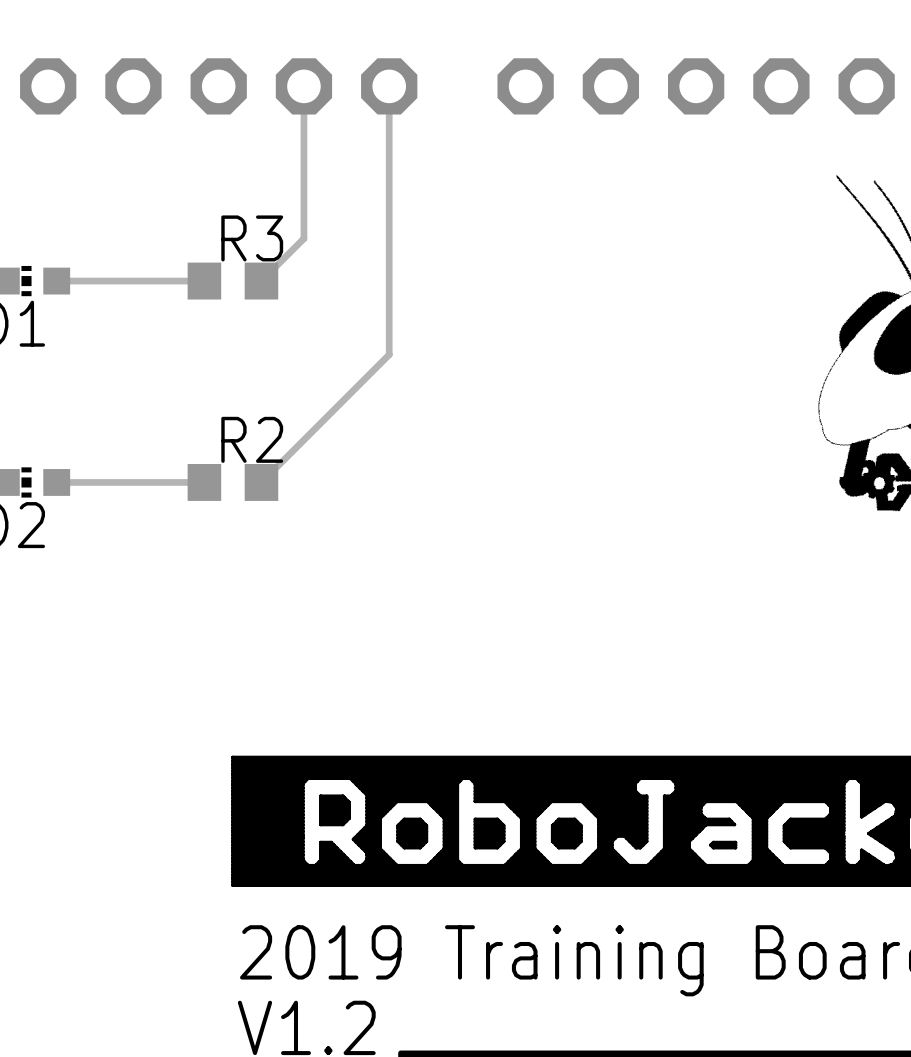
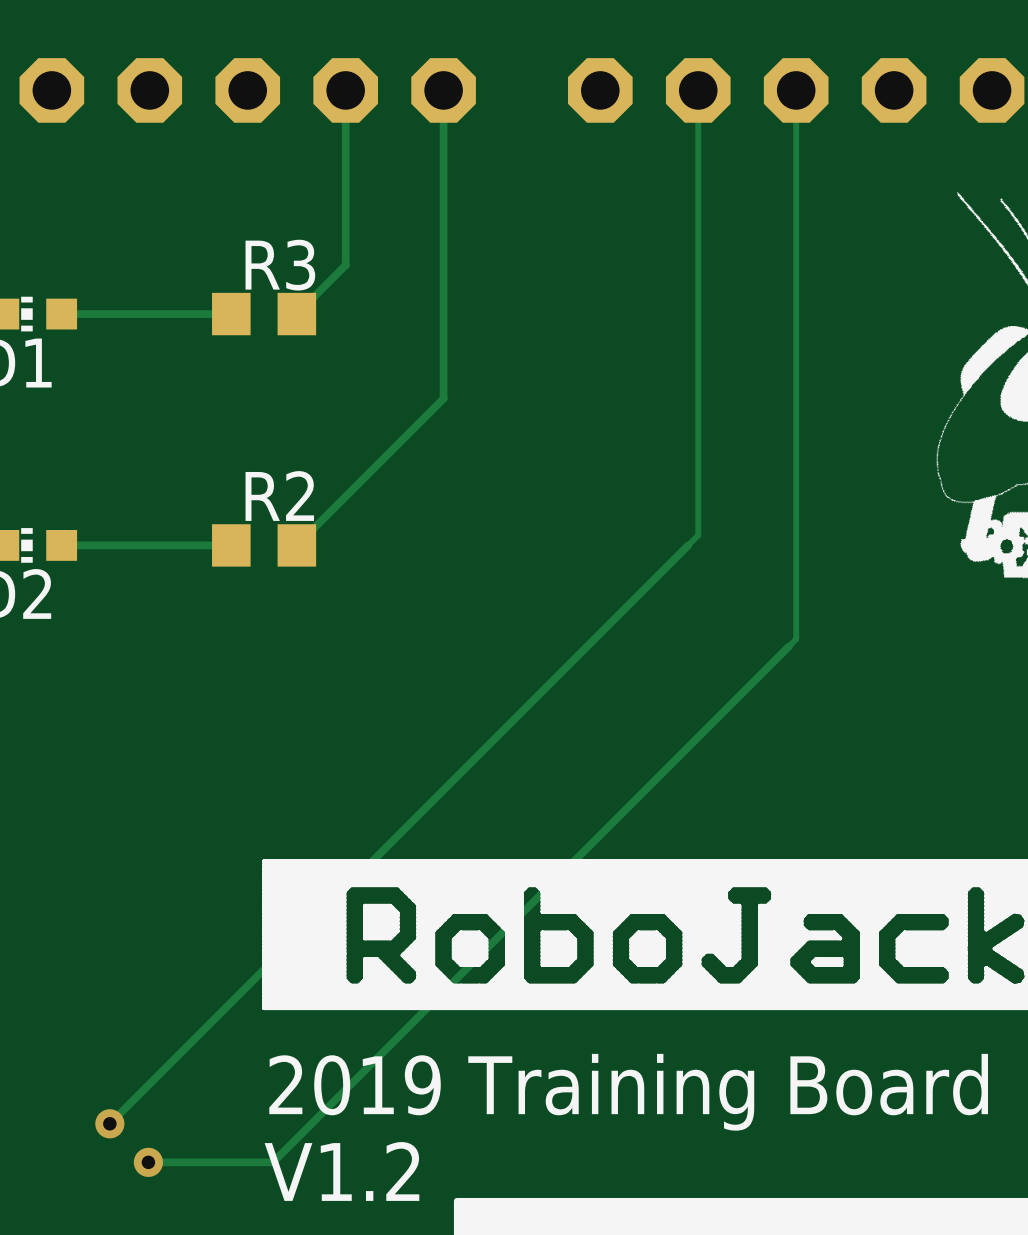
track: none -> (698, 90) (698, 535) (109, 1123)
track: none -> (796, 90) (796, 639) (273, 1162) (148, 1162)
via: none -> (109, 1123)
via: none -> (148, 1162)

